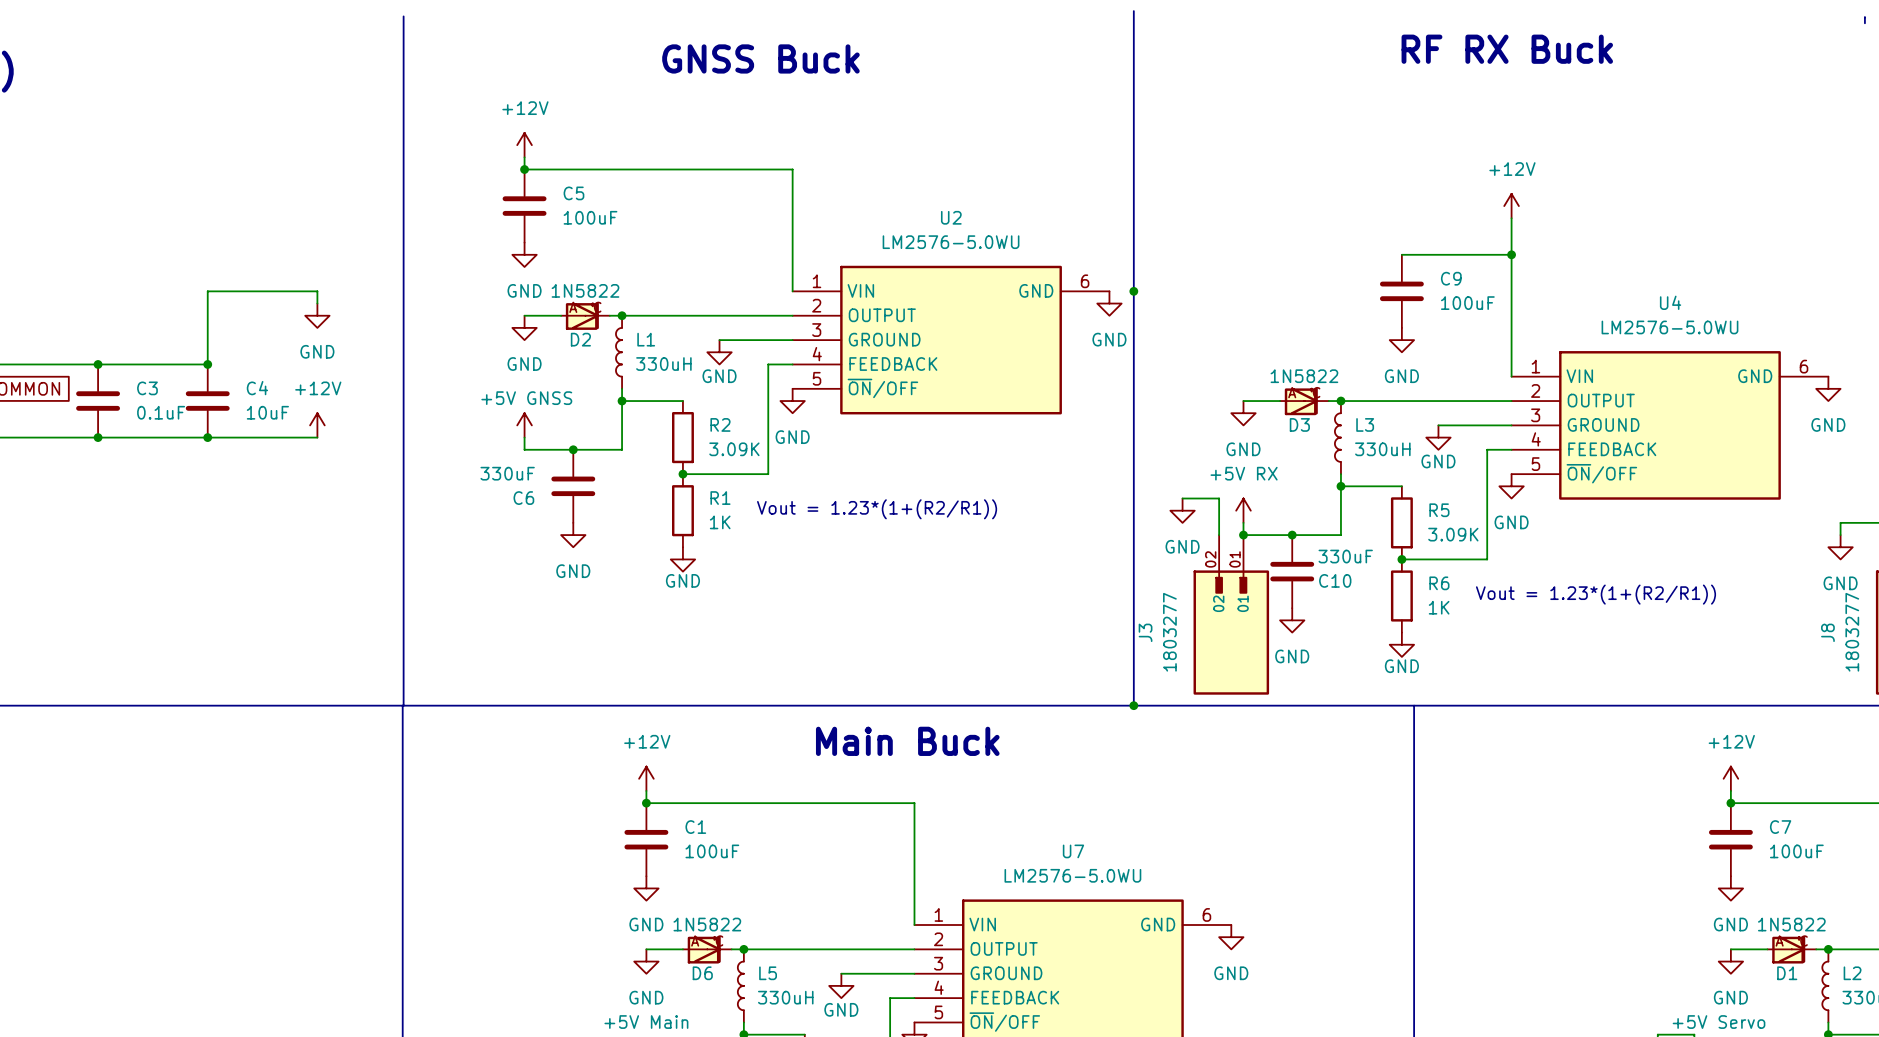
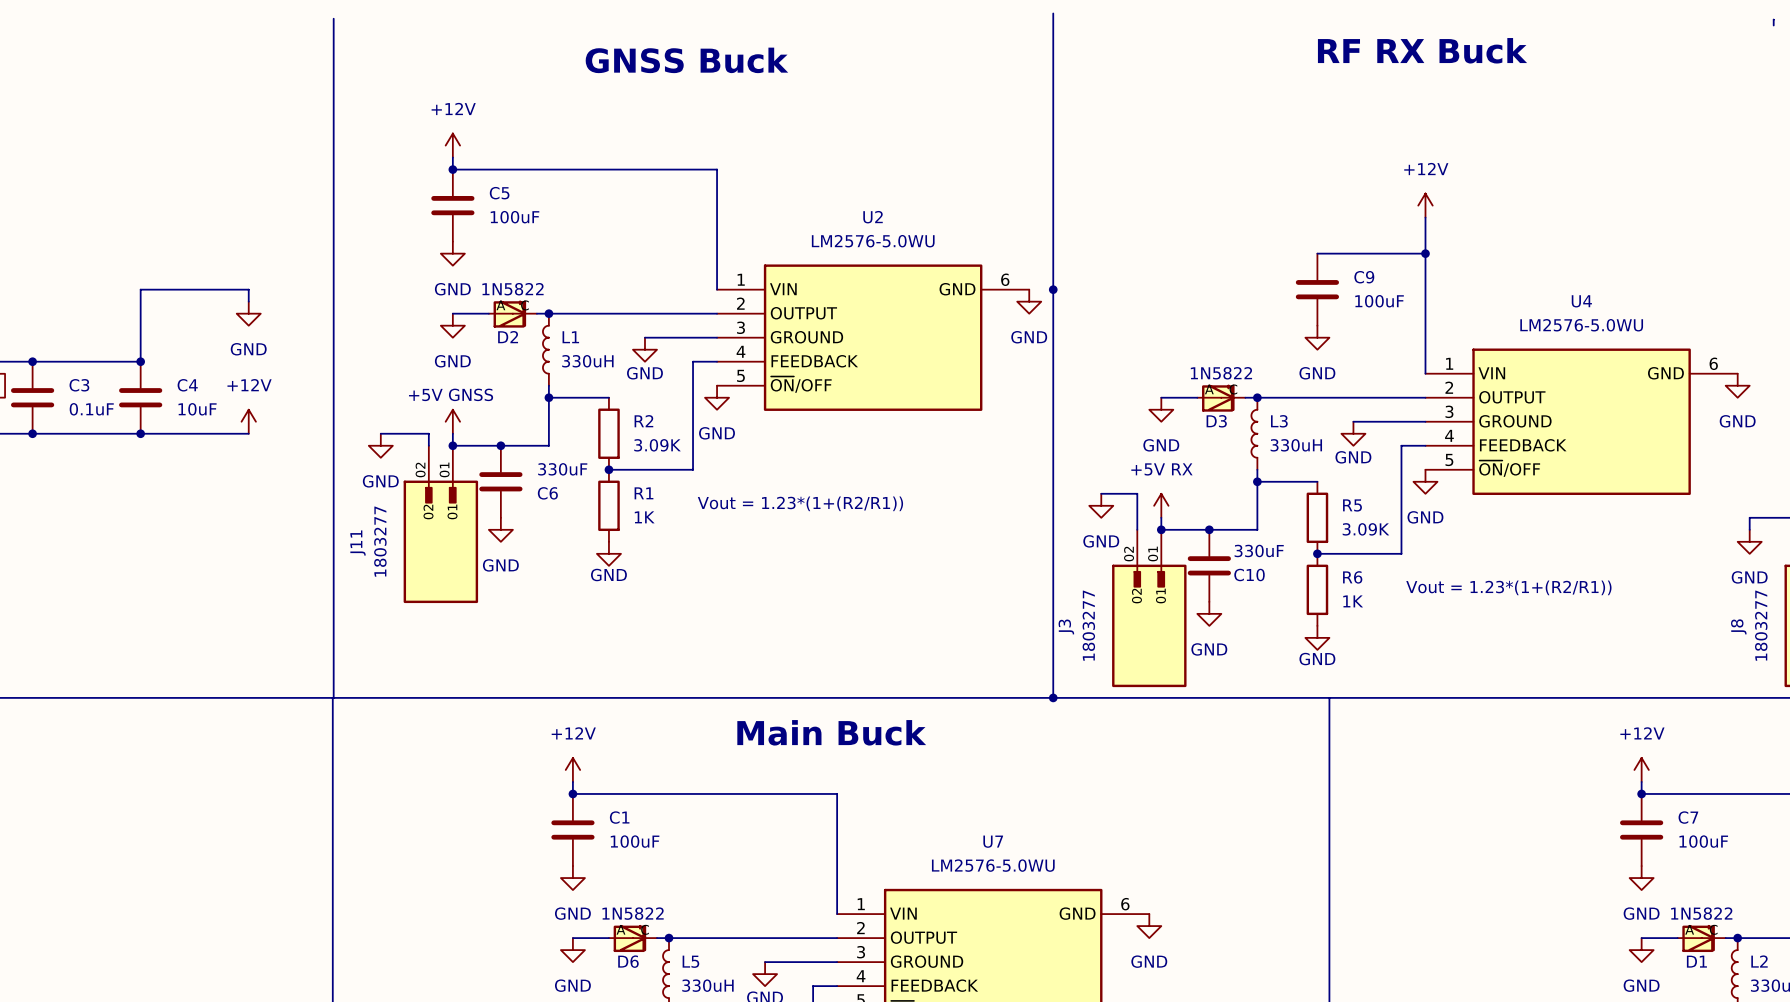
wire: none -> (380, 433) (428, 433) (428, 445)
power symbol: none -> GND (380, 445)
junction: none -> (452, 445)
C6 value position: 330uF (507, 473) -> 330uF (562, 469)
C6 name position: C6 (523, 498) -> C6 (547, 493)
J11: none -> 1803277 (440, 524)

